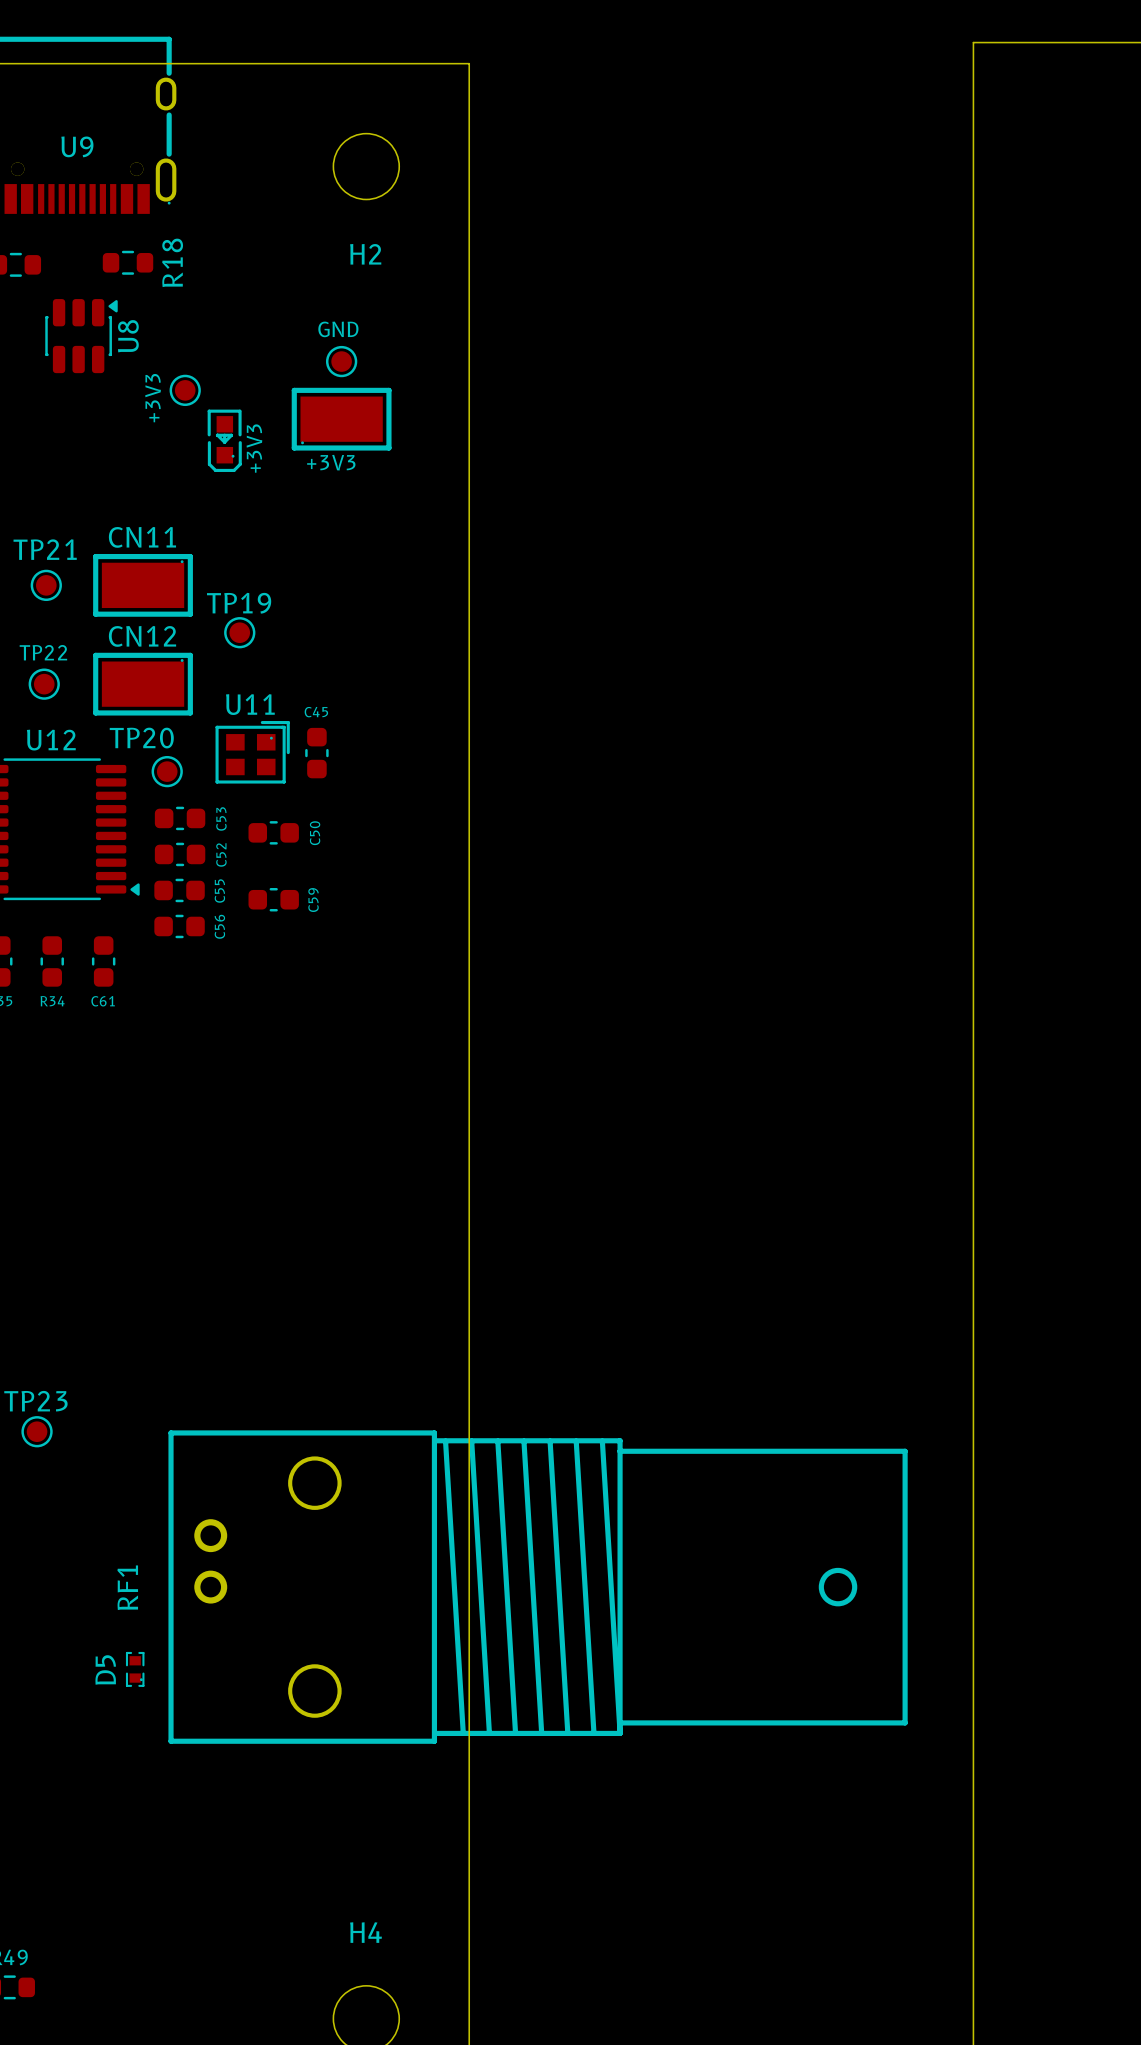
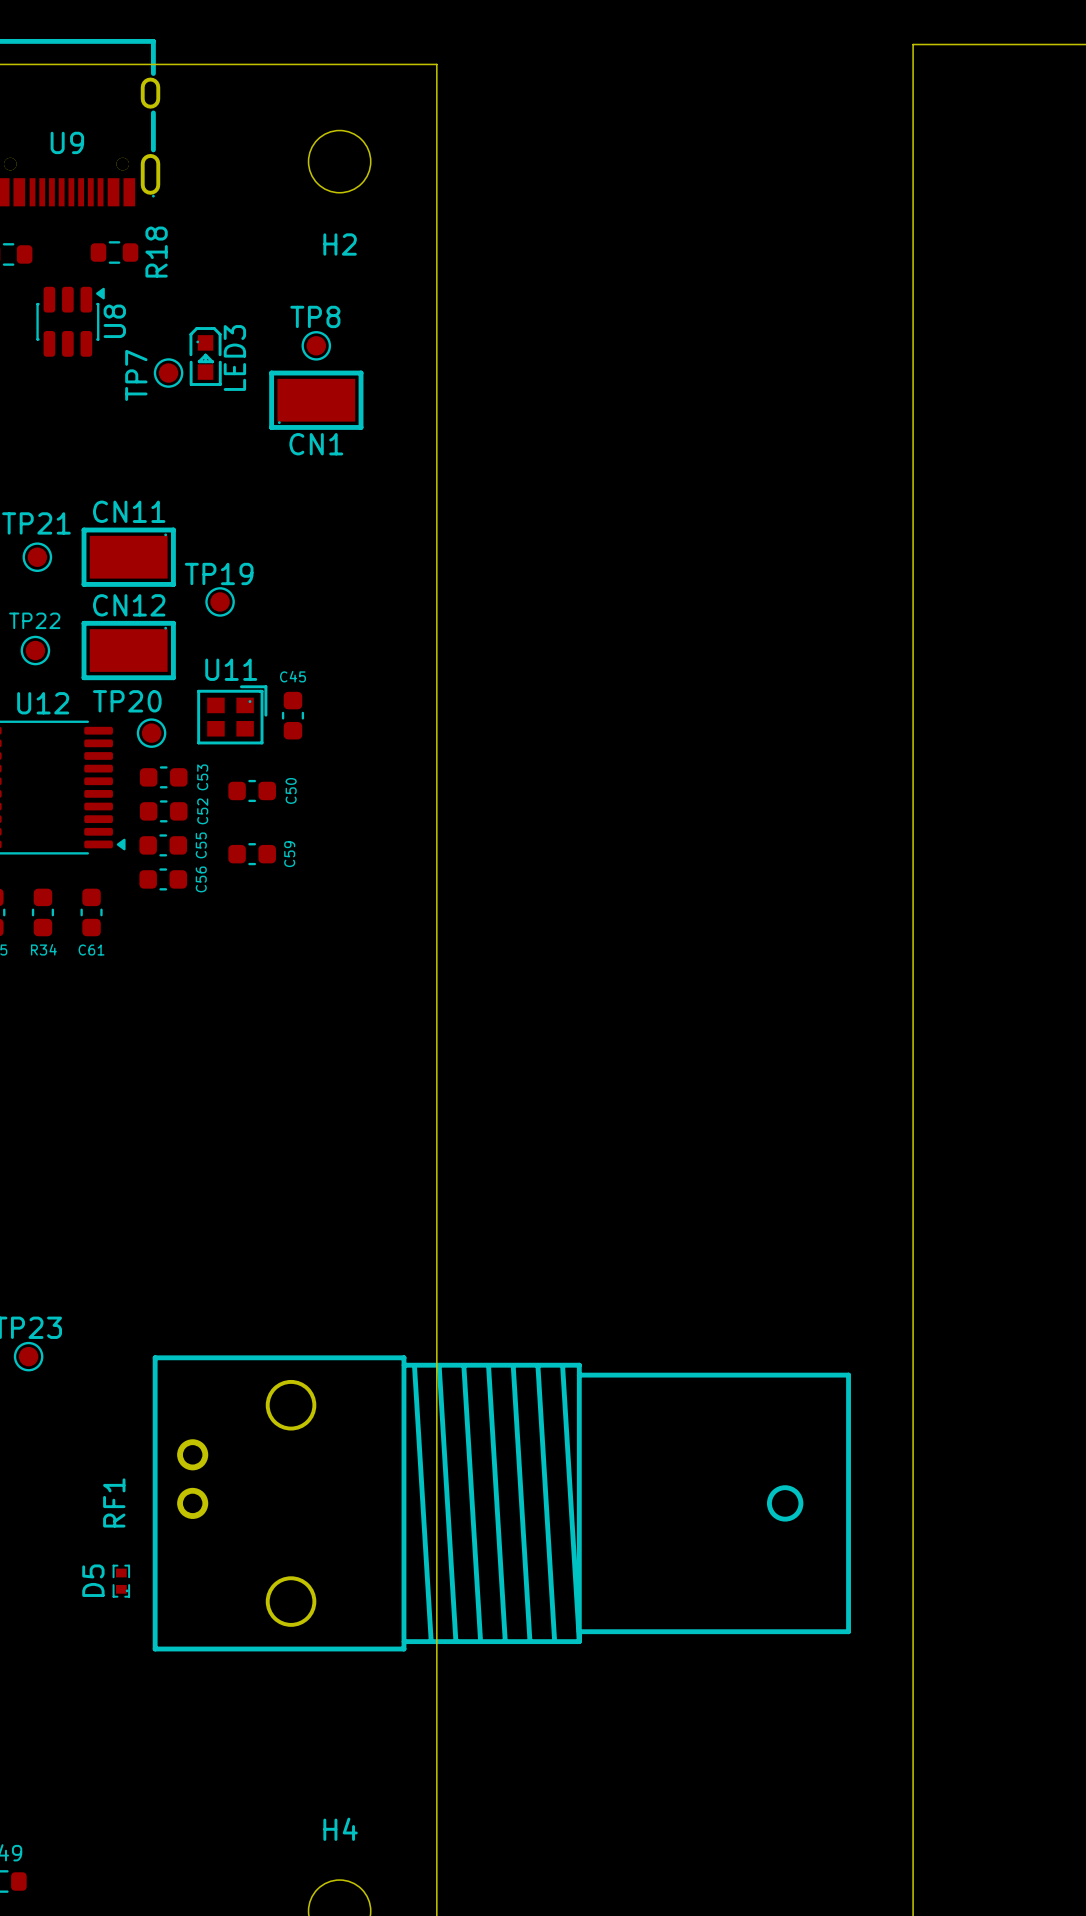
text: GND (338, 329) -> none
TP8 name: none -> TP8 (315, 316)
LED3: none -> (205, 356)
TP7 name: none -> TP7 (136, 375)
text: +3V3 (153, 398) -> none
part: (224, 440) -> none
text: +3V3 (254, 448) -> none
text: +3V3 (331, 462) -> none
CN1 name: none -> CN1 (316, 444)

